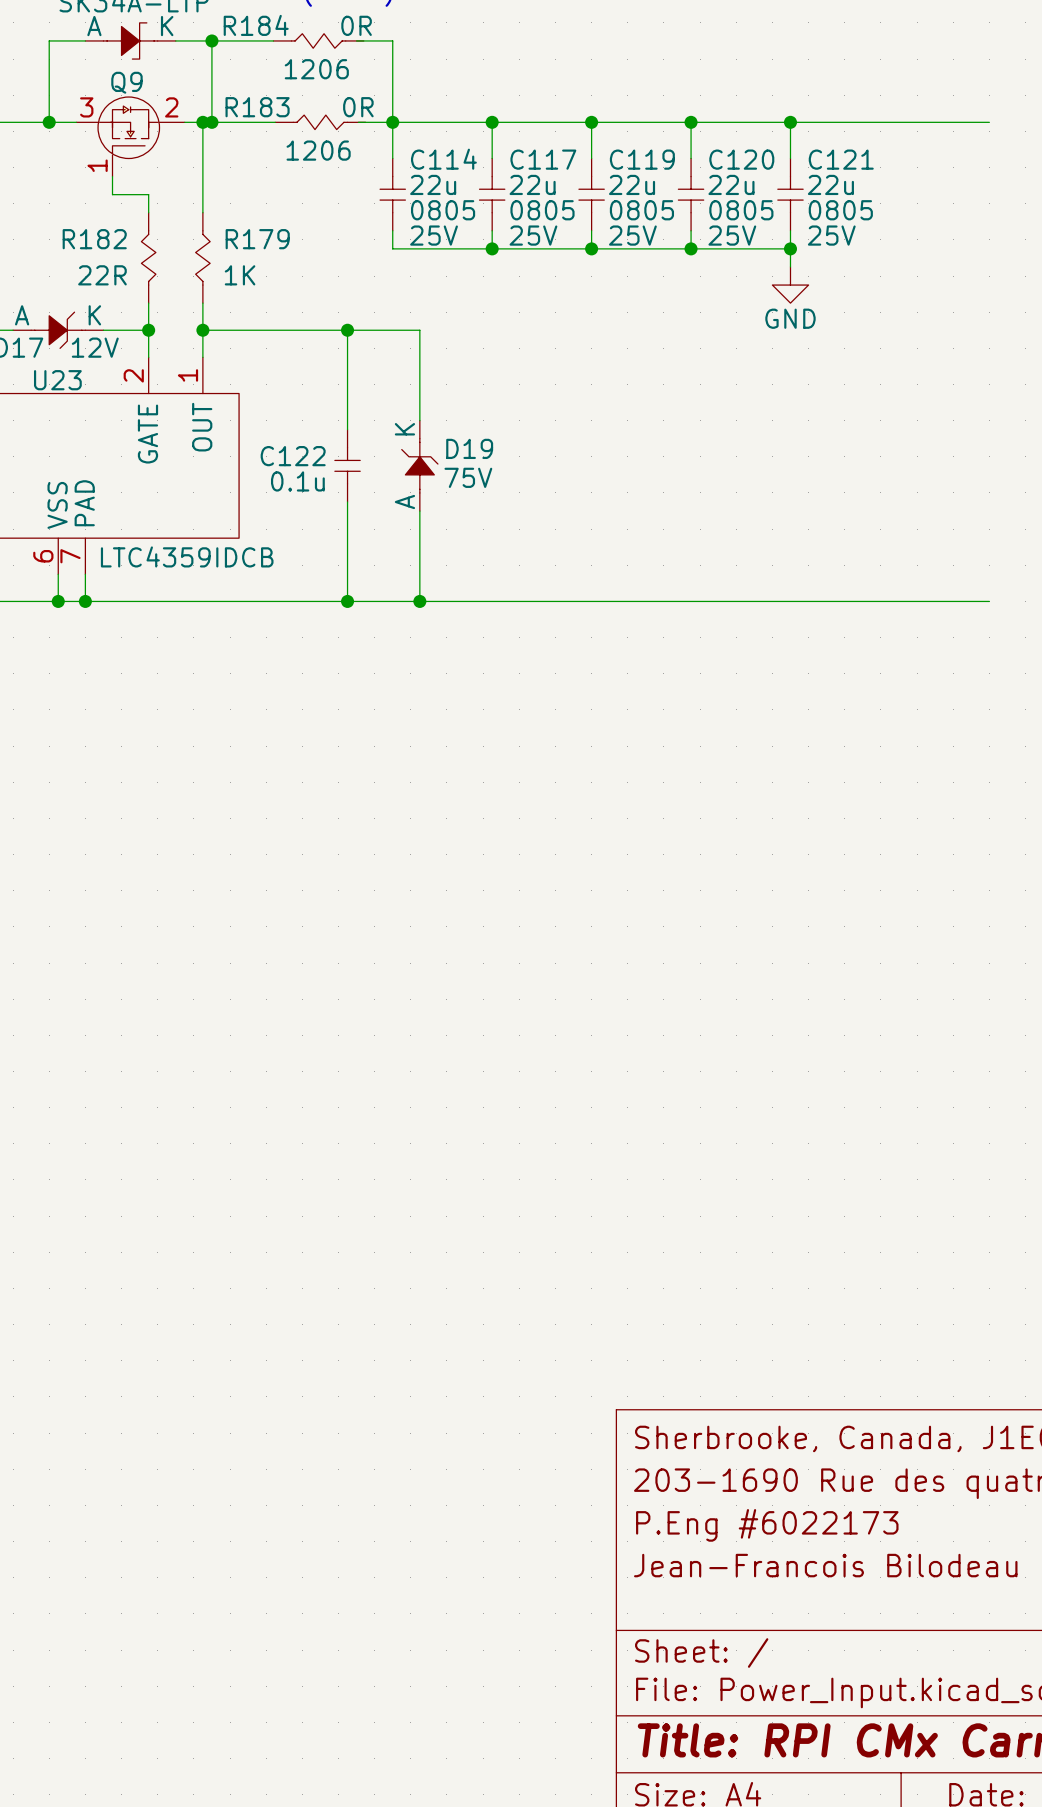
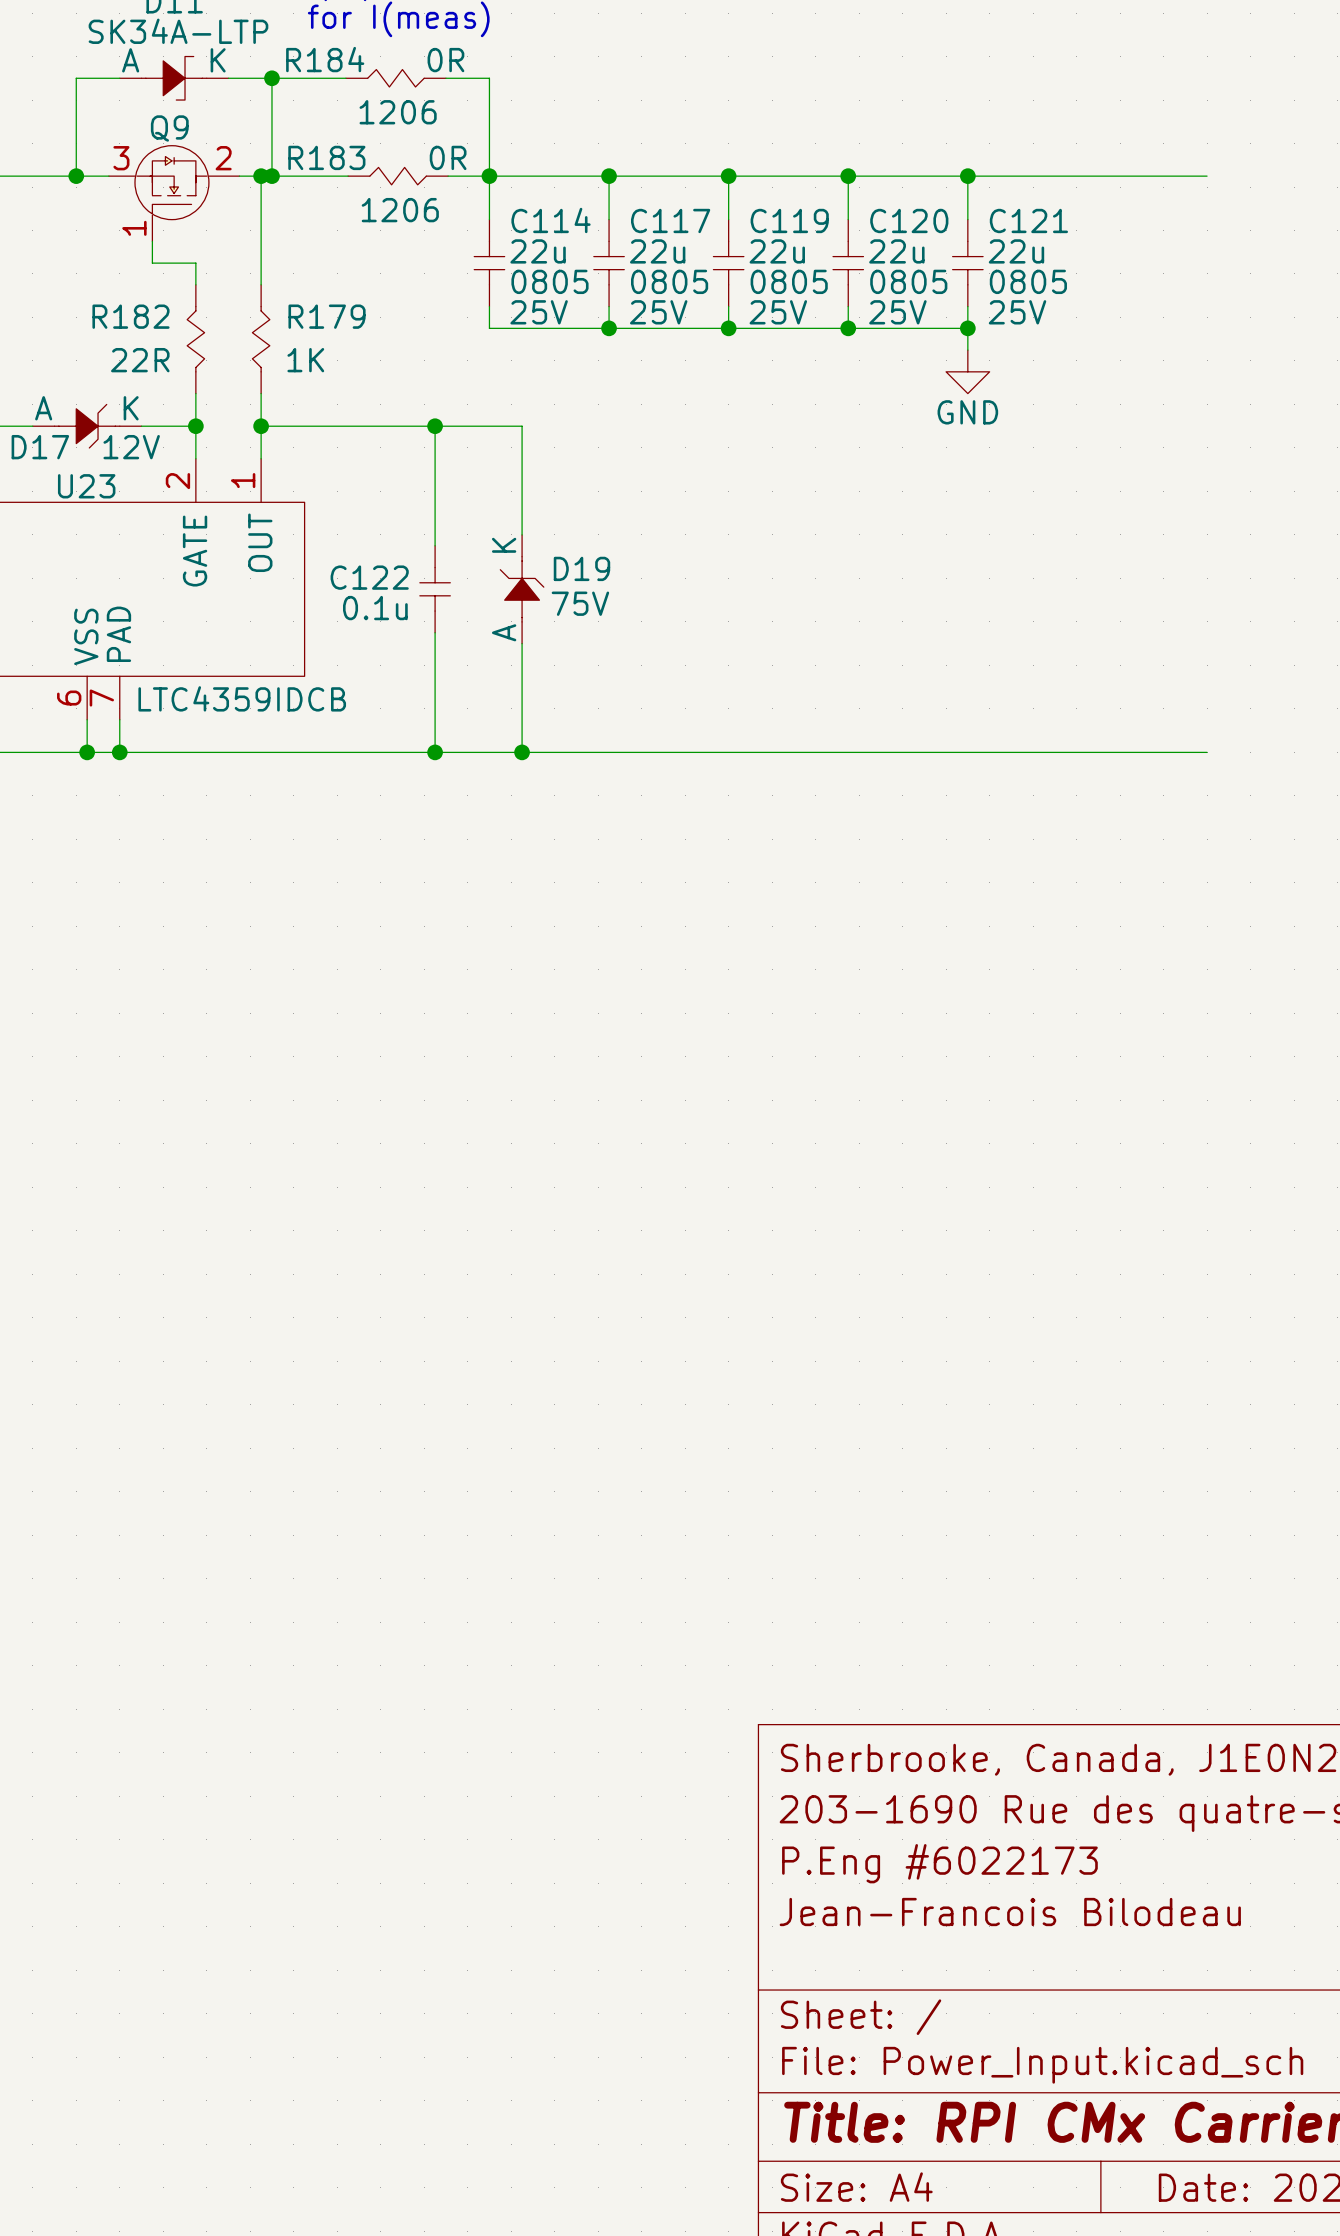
R184 symbol: [273, 33, 364, 49] -> [345, 69, 446, 87]
R183 symbol: [275, 115, 366, 130] -> [348, 167, 449, 185]

